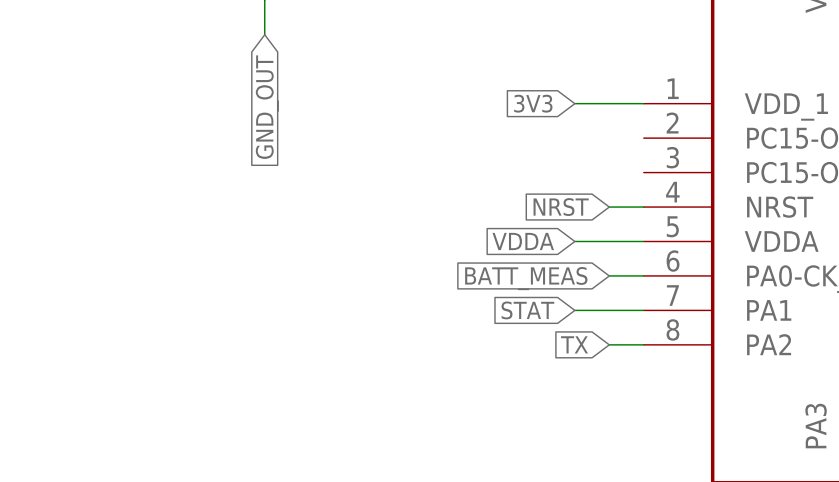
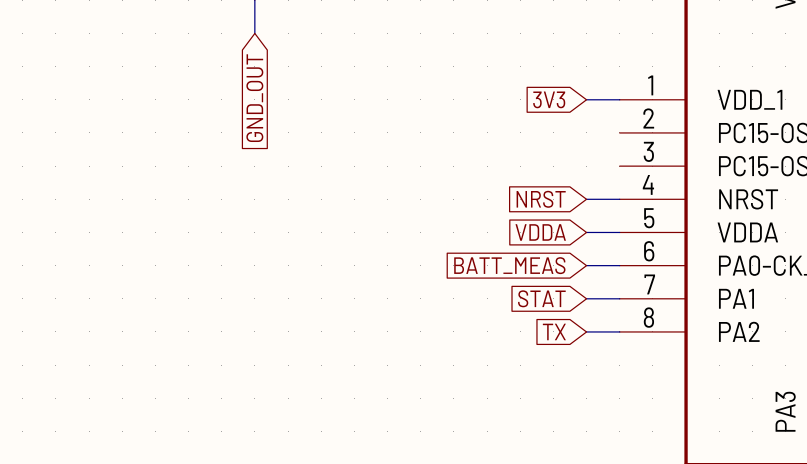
global label position: 3V3 (533, 103) -> 3V3 (549, 99)
wire: (574, 103) (609, 103) -> none
global label position: VDDA (523, 241) -> VDDA (540, 232)
wire: (574, 241) (609, 241) -> none
global label position: STAT (527, 310) -> STAT (541, 298)
wire: (574, 310) (609, 310) -> none

